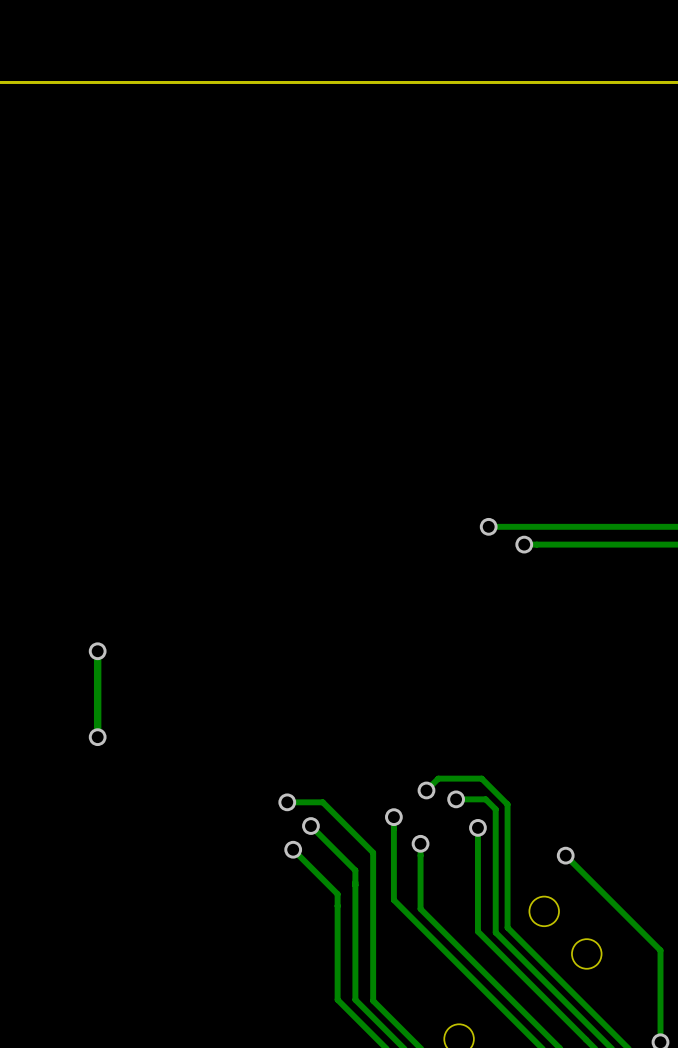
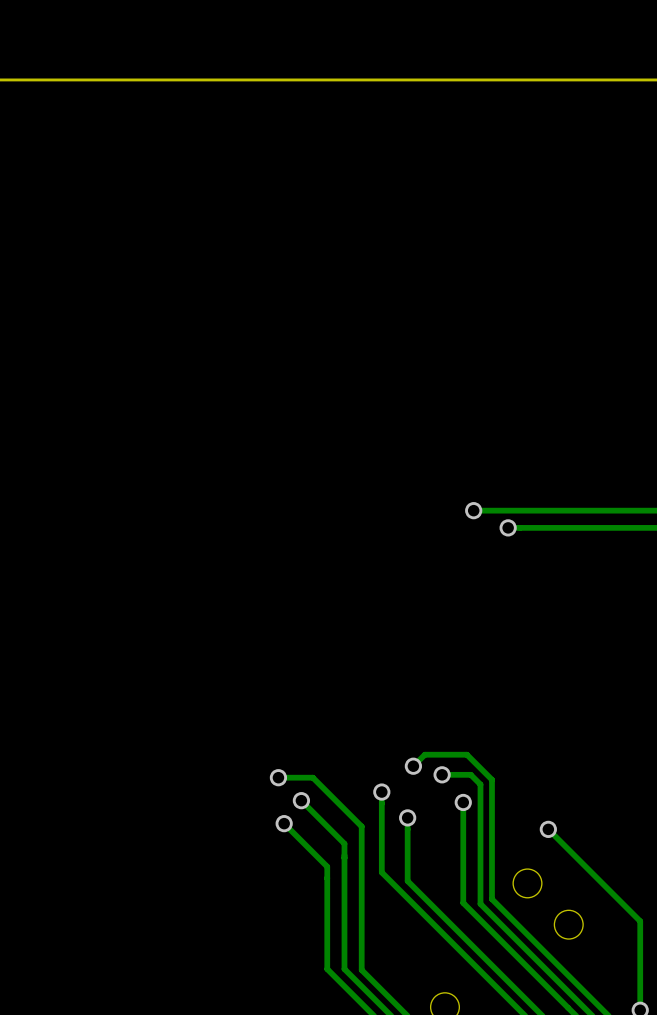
track: (97, 651) (97, 737) -> none
via: (97, 651) -> none
via: (97, 737) -> none

